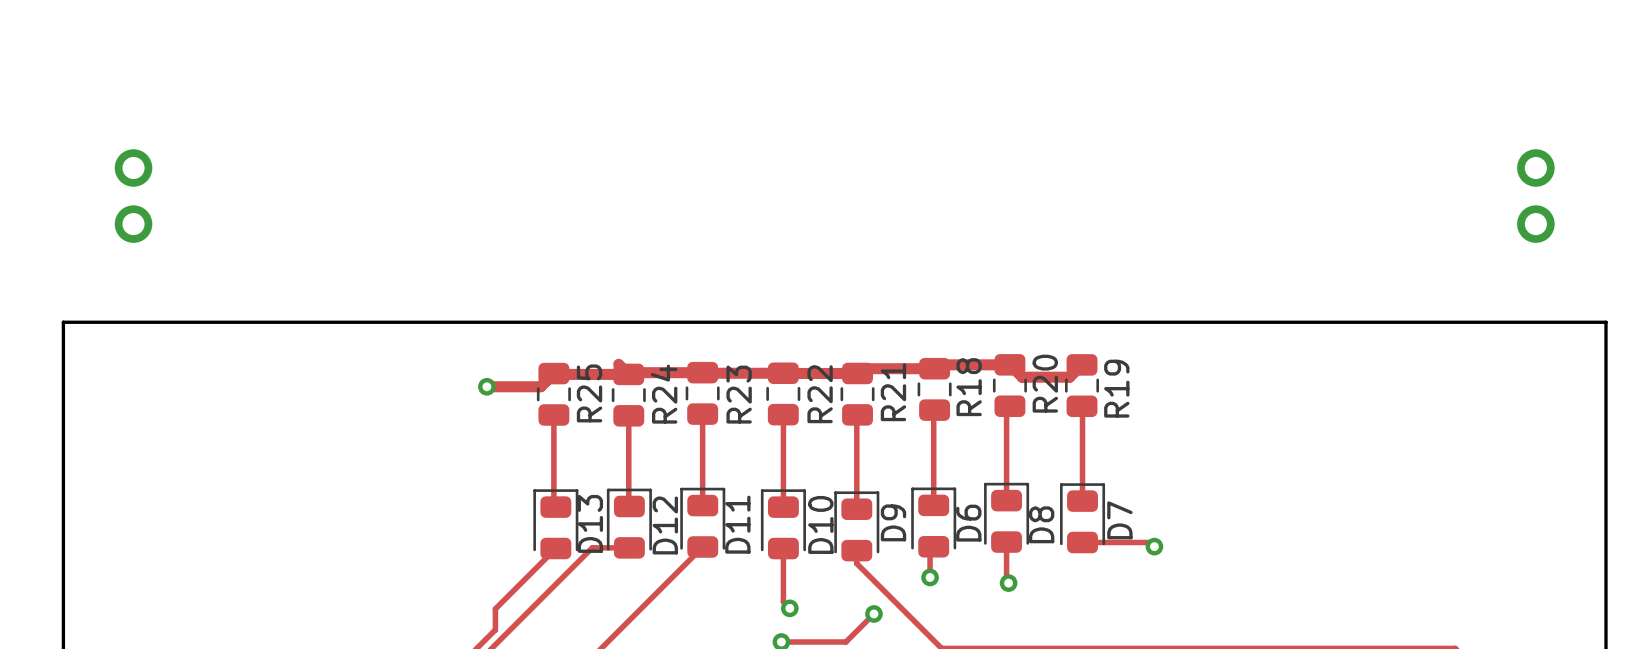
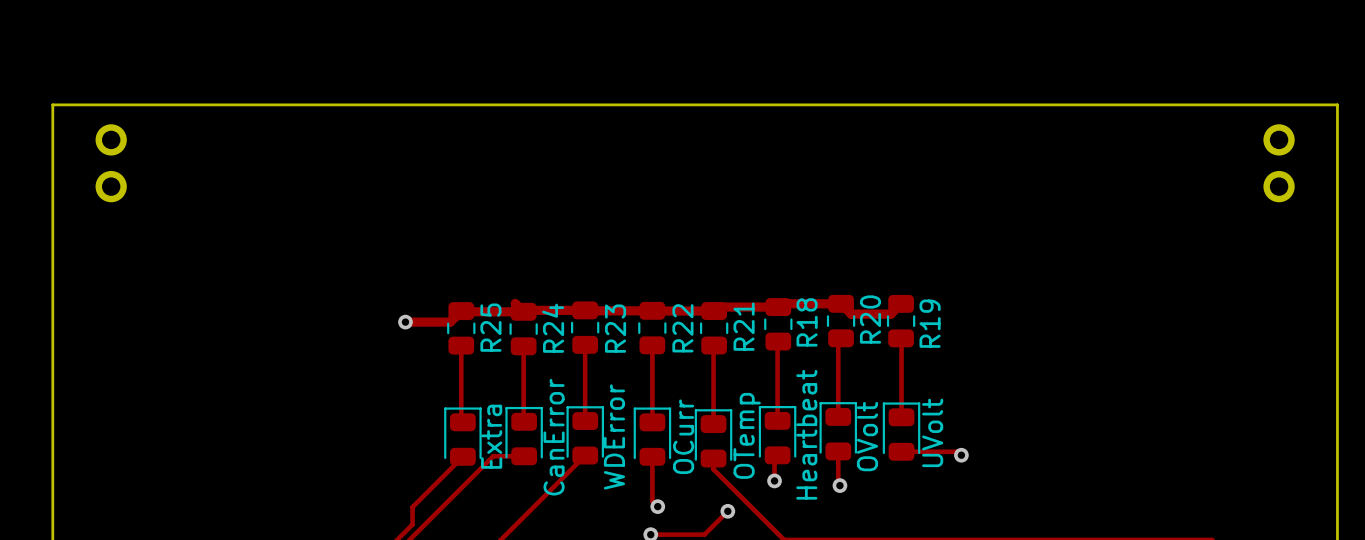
board edge: (63, 322) (1606, 322) -> (52, 268) (52, 104) (1337, 104) (1337, 268)
D7 name: D7 (1119, 520) -> UVolt (932, 432)
D9 name: D9 (893, 522) -> OTemp (747, 435)
D13 name: D13 (590, 523) -> Extra (491, 436)
D6 name: D6 (968, 523) -> Heartbeat (806, 434)
D11 name: D11 (737, 524) -> WDError (614, 436)
D10 name: D10 (820, 524) -> OCurr (683, 436)
D8 name: D8 (1041, 524) -> OVolt (867, 436)
D12 name: D12 (665, 525) -> CanError (554, 437)

